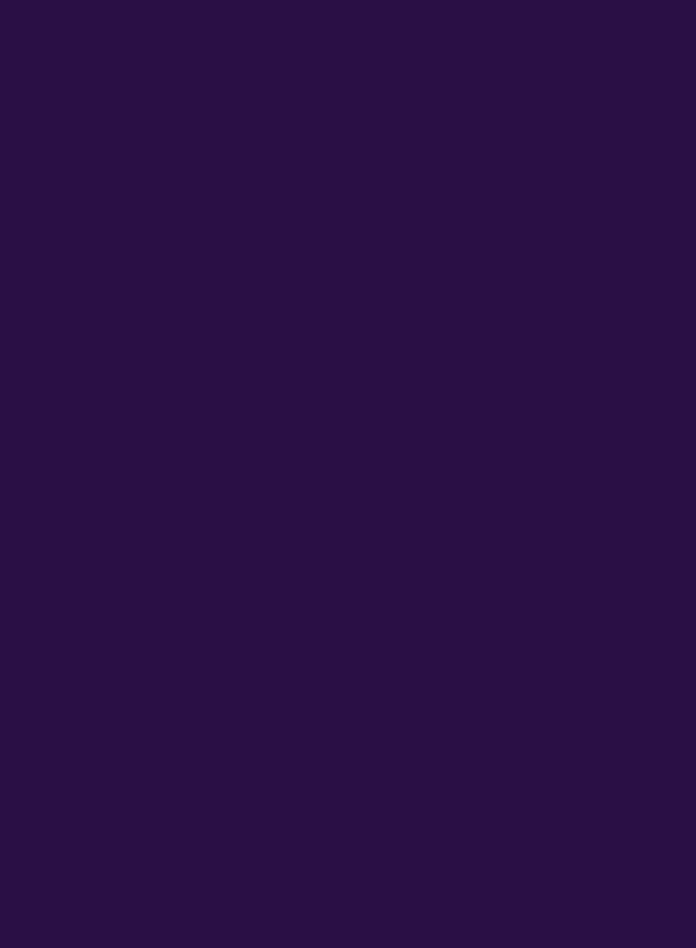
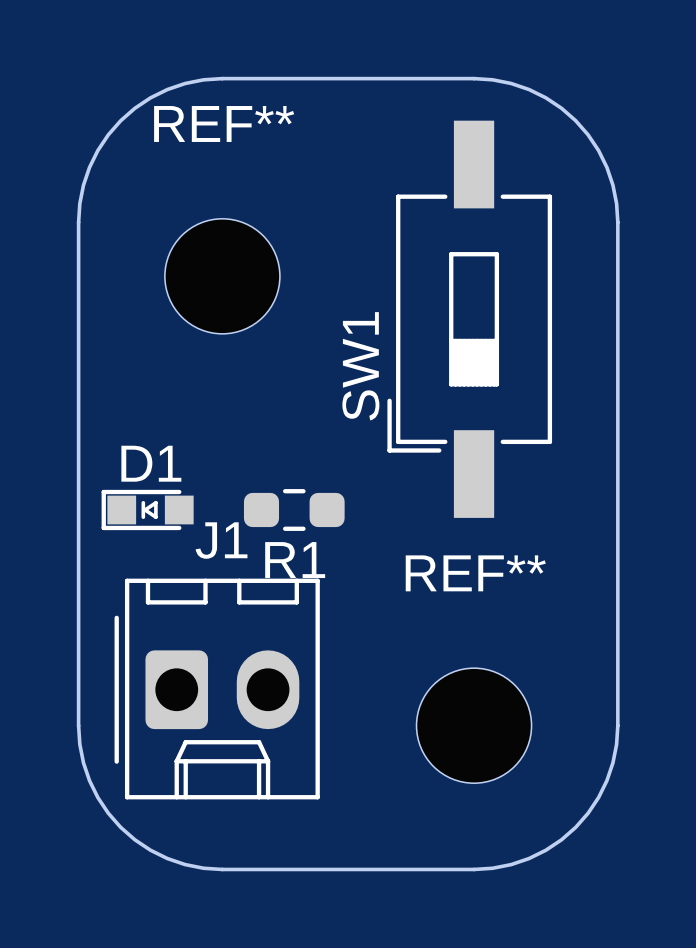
board edge: none -> (222, 78) (474, 78) (511, 83) (529, 89) (561, 108) (588, 134) (606, 167) (612, 185) (617, 222) (616, 744) (606, 780) (588, 813) (561, 839) (529, 858) (511, 864) (474, 869) (203, 868) (167, 858) (134, 839) (108, 813) (89, 780) (79, 744) (78, 725) (79, 203) (89, 167) (97, 150) (120, 120) (134, 108) (150, 97) (185, 83) (222, 78)
REF**: none -> (222, 276)
SW1: none -> (469, 319)
D1: none -> (147, 509)
R1: none -> (294, 509)
J1: none -> (217, 689)
REF**: none -> (474, 725)

